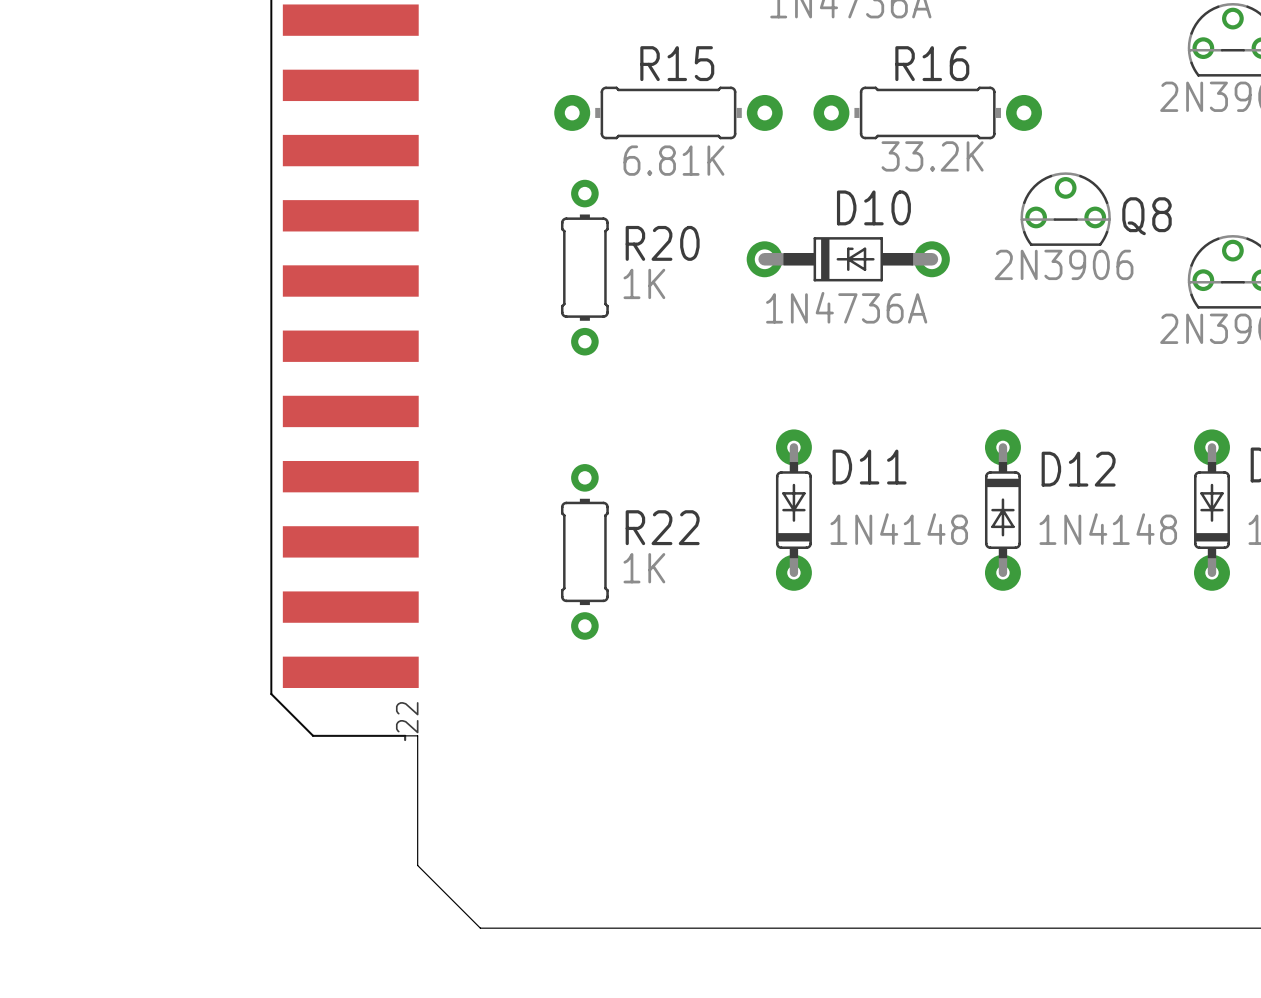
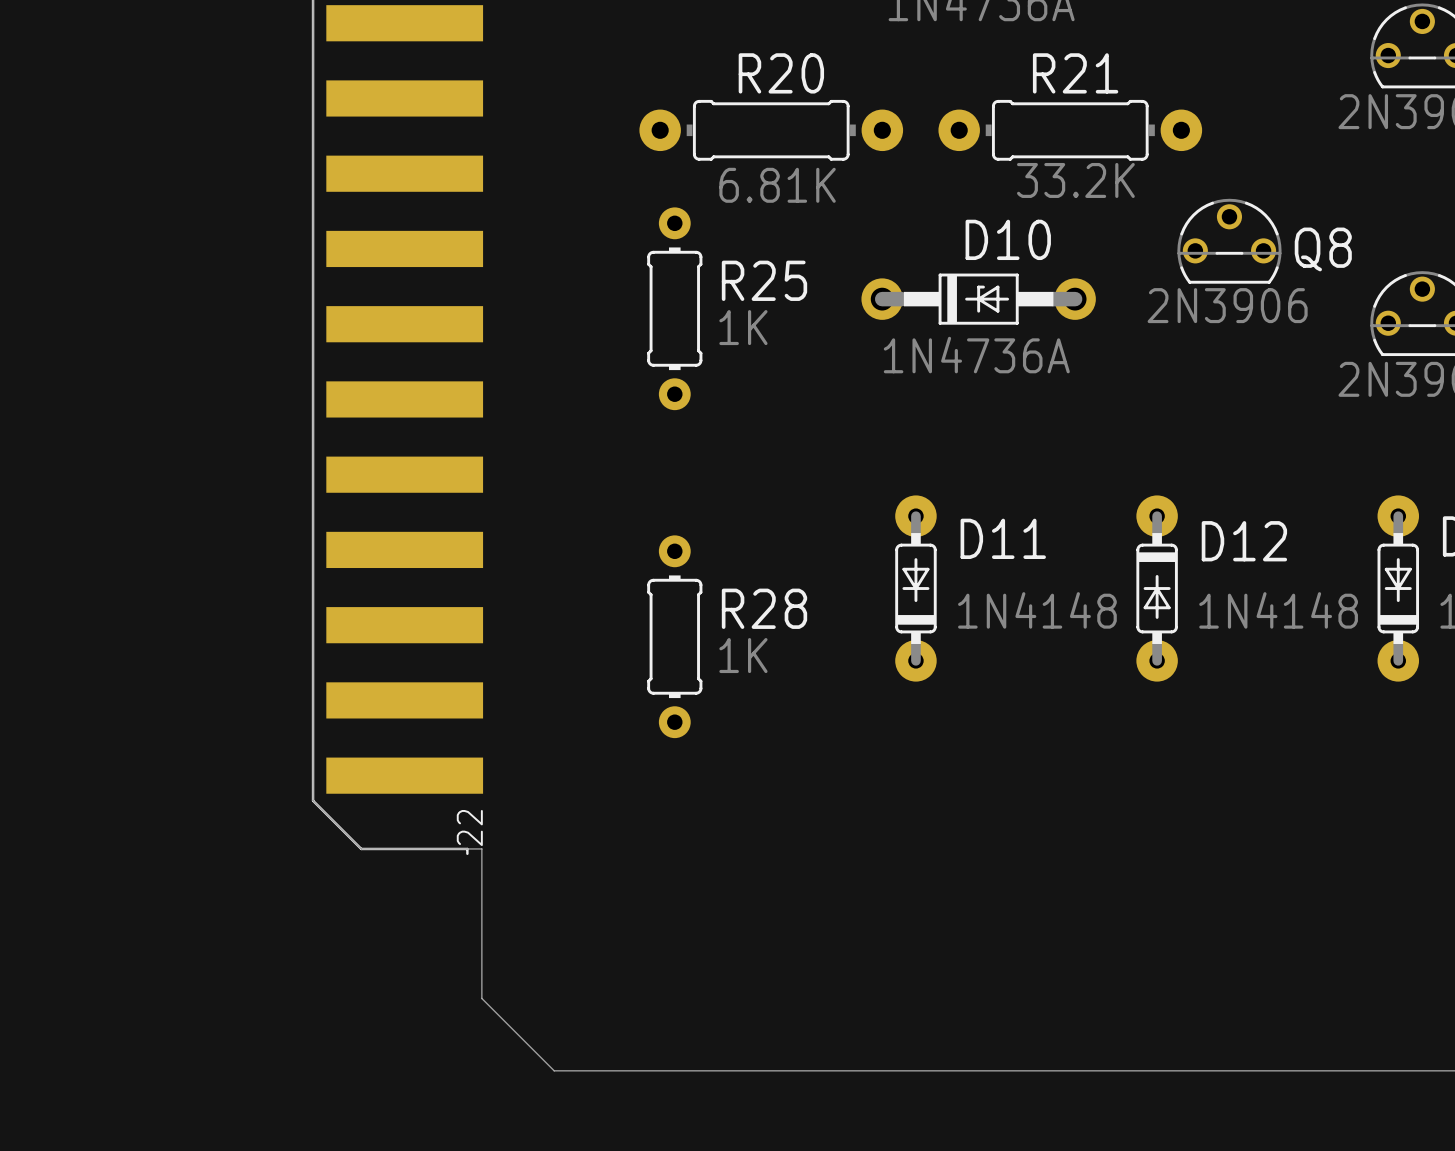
R15 name: R15 (677, 63) -> R20 (781, 73)
R16 name: R16 (932, 63) -> R21 (1075, 73)
R20 name: R20 (662, 243) -> R25 (764, 280)
R22 name: R22 (662, 527) -> R28 (764, 608)

